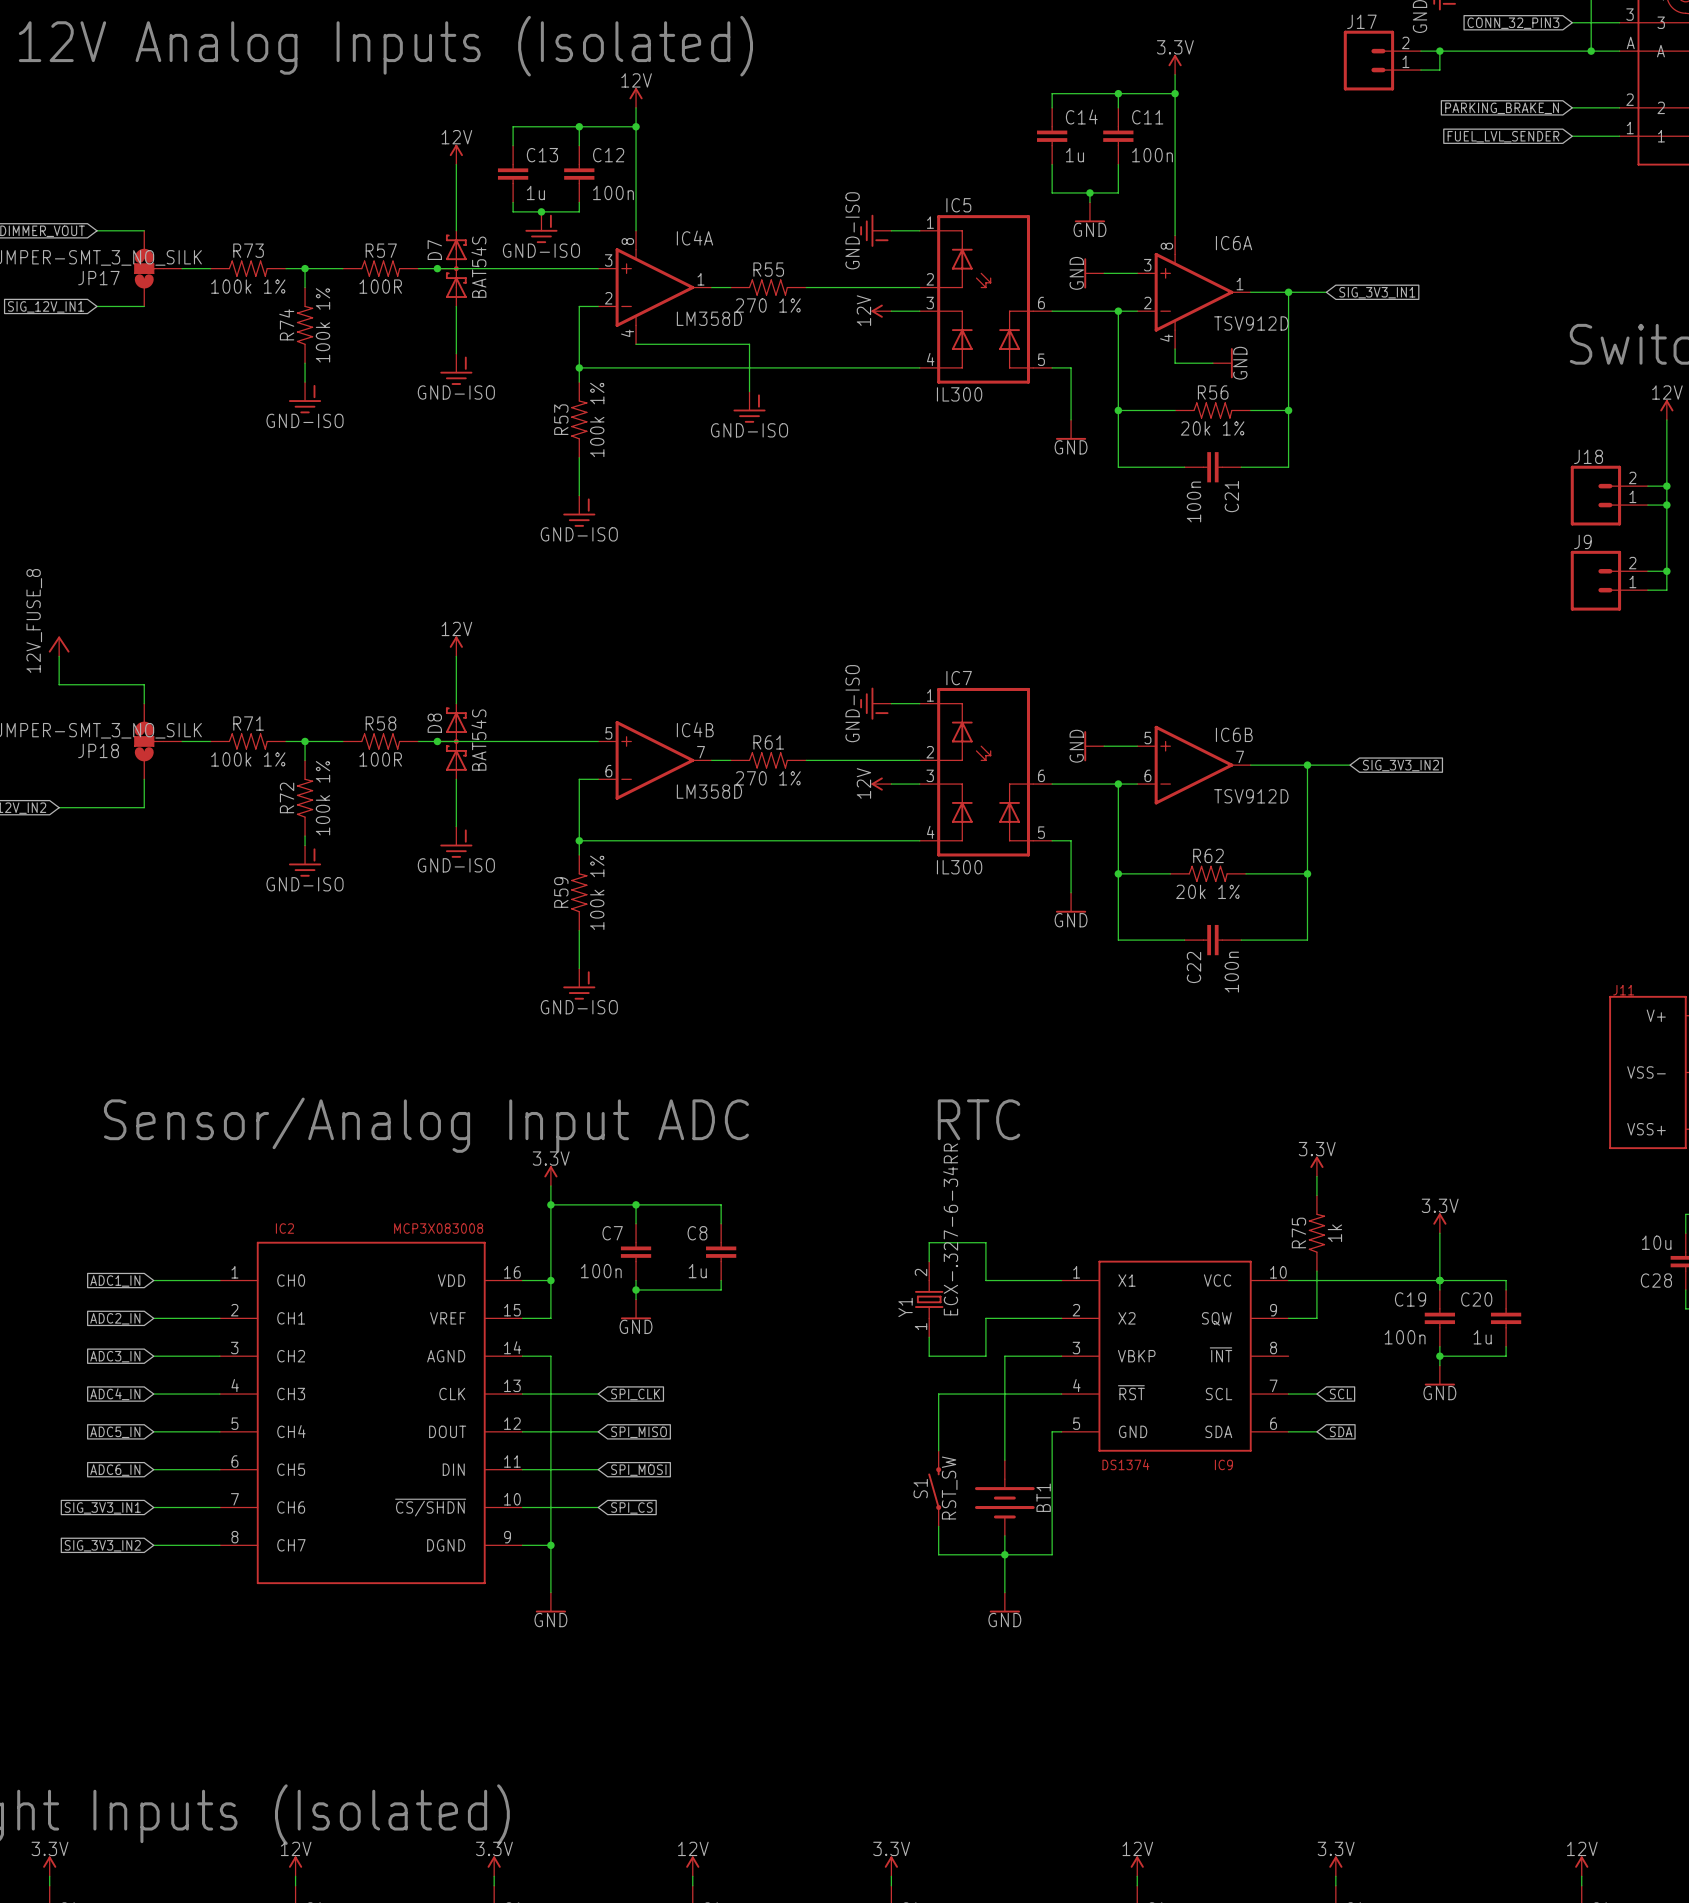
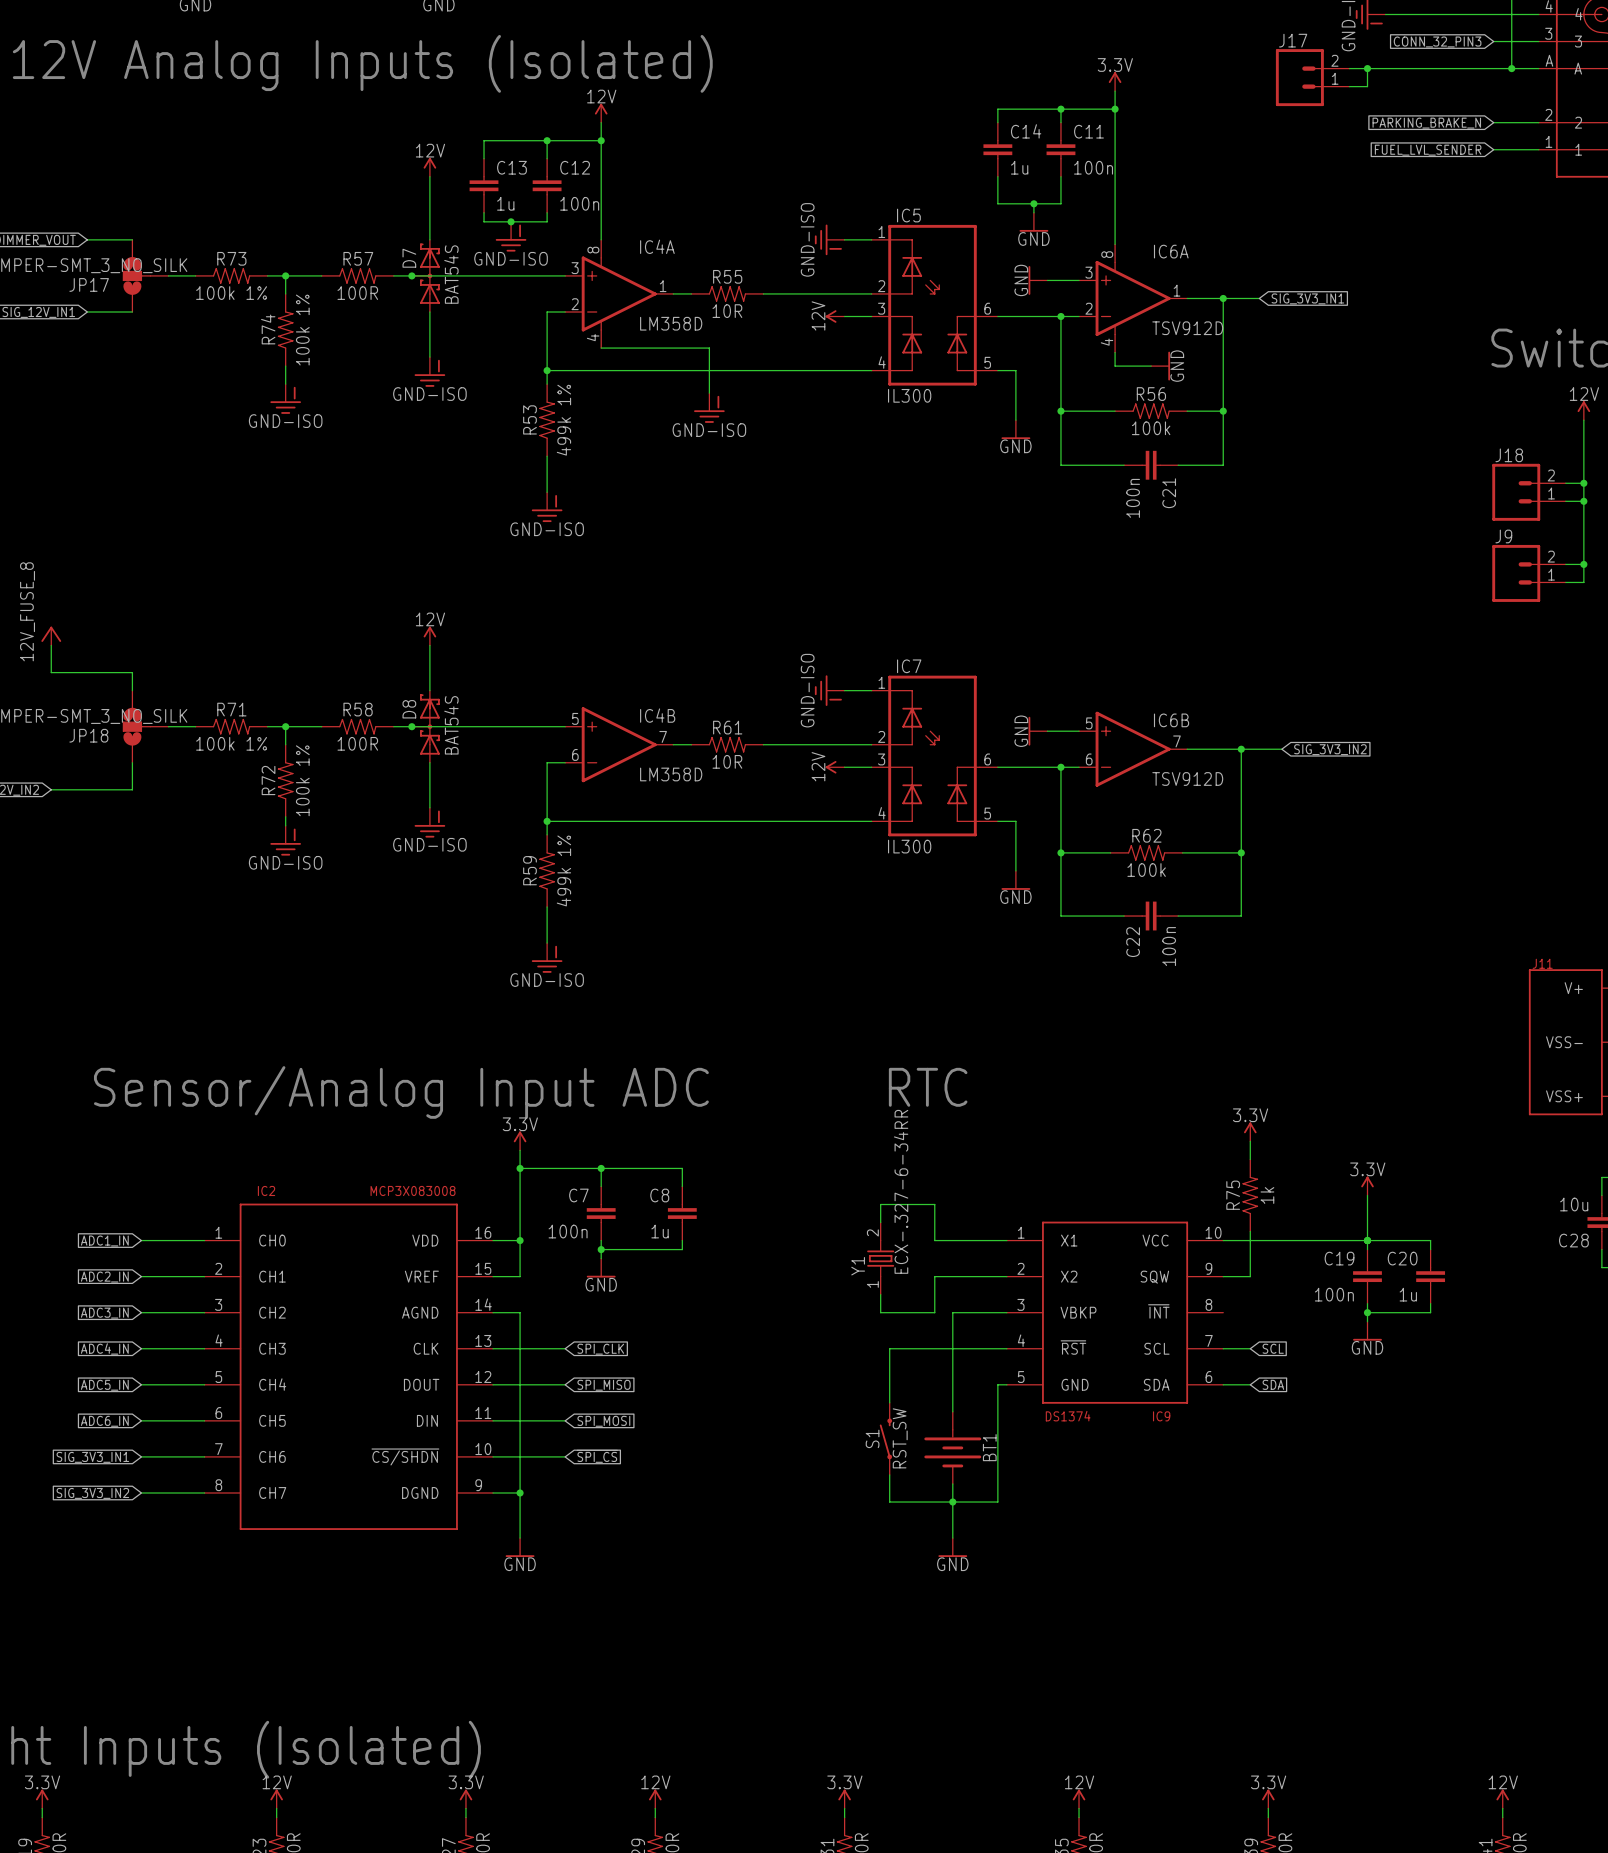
R55 value: 270 1% (768, 305) -> 10R (727, 311)
R53 value: 100k 1% (597, 419) -> 499k 1% (563, 420)
R56 value: 20k 1% (1212, 428) -> 100k (1151, 428)
R61 value: 270 1% (768, 778) -> 10R (727, 761)
R62 value: 20k 1% (1207, 891) -> 100k (1146, 870)
R59 value: 100k 1% (597, 892) -> 499k 1% (563, 870)

